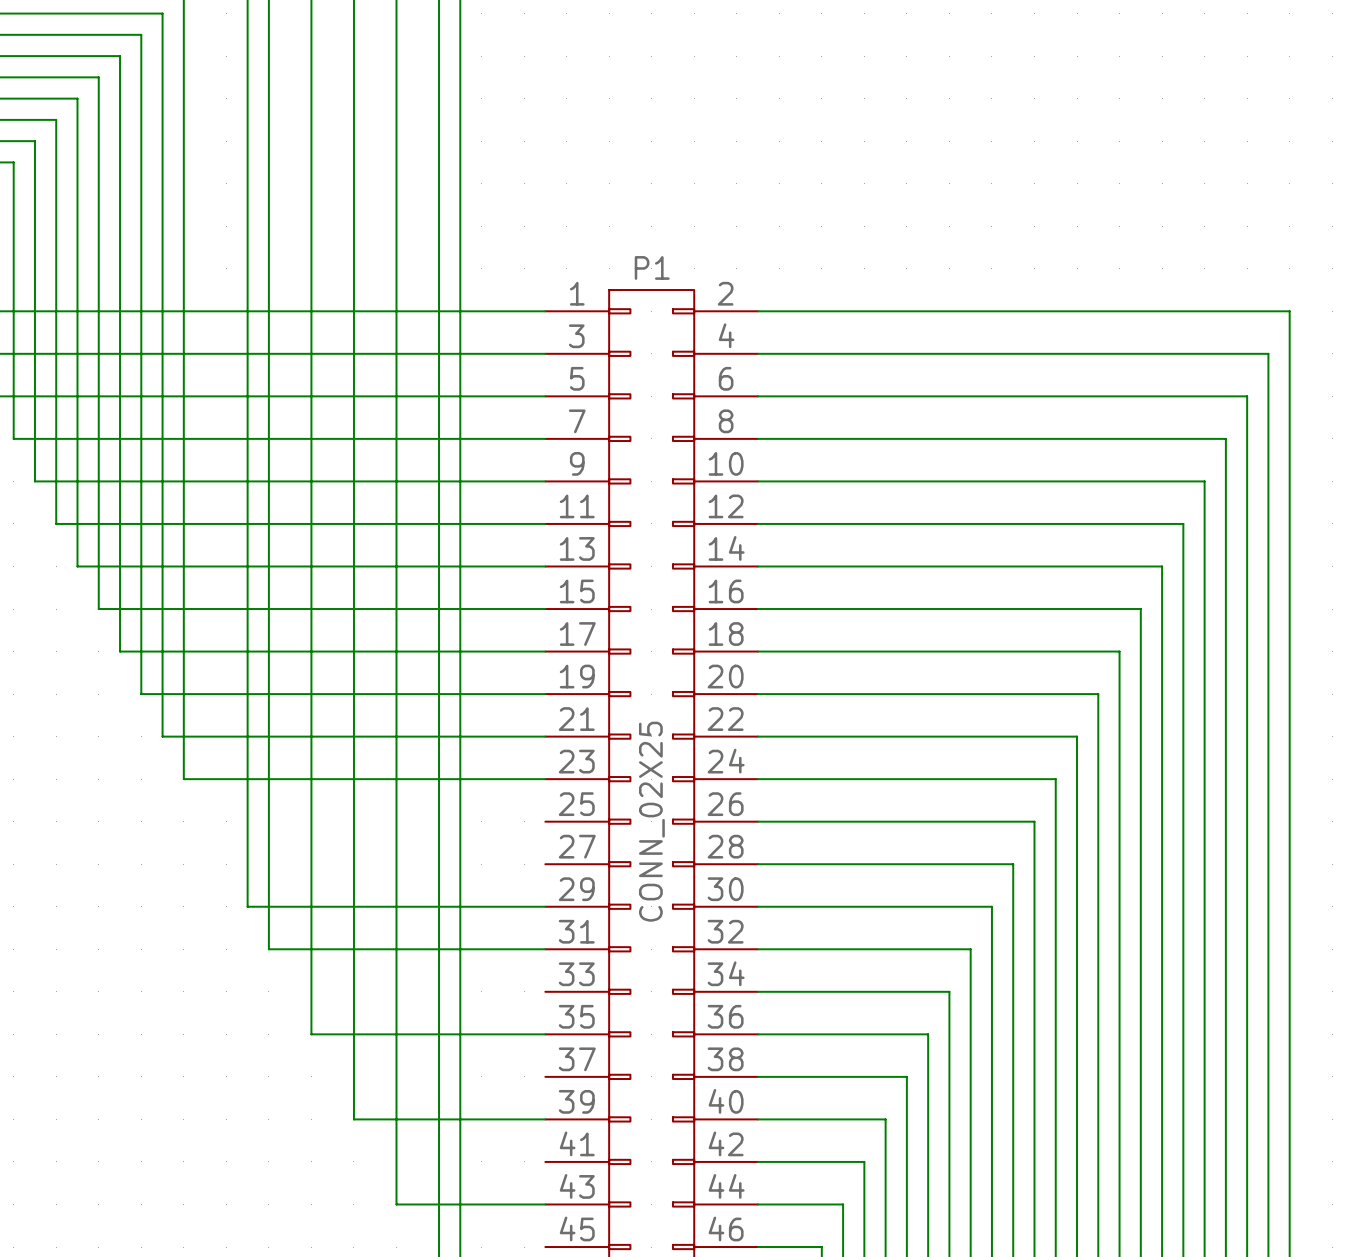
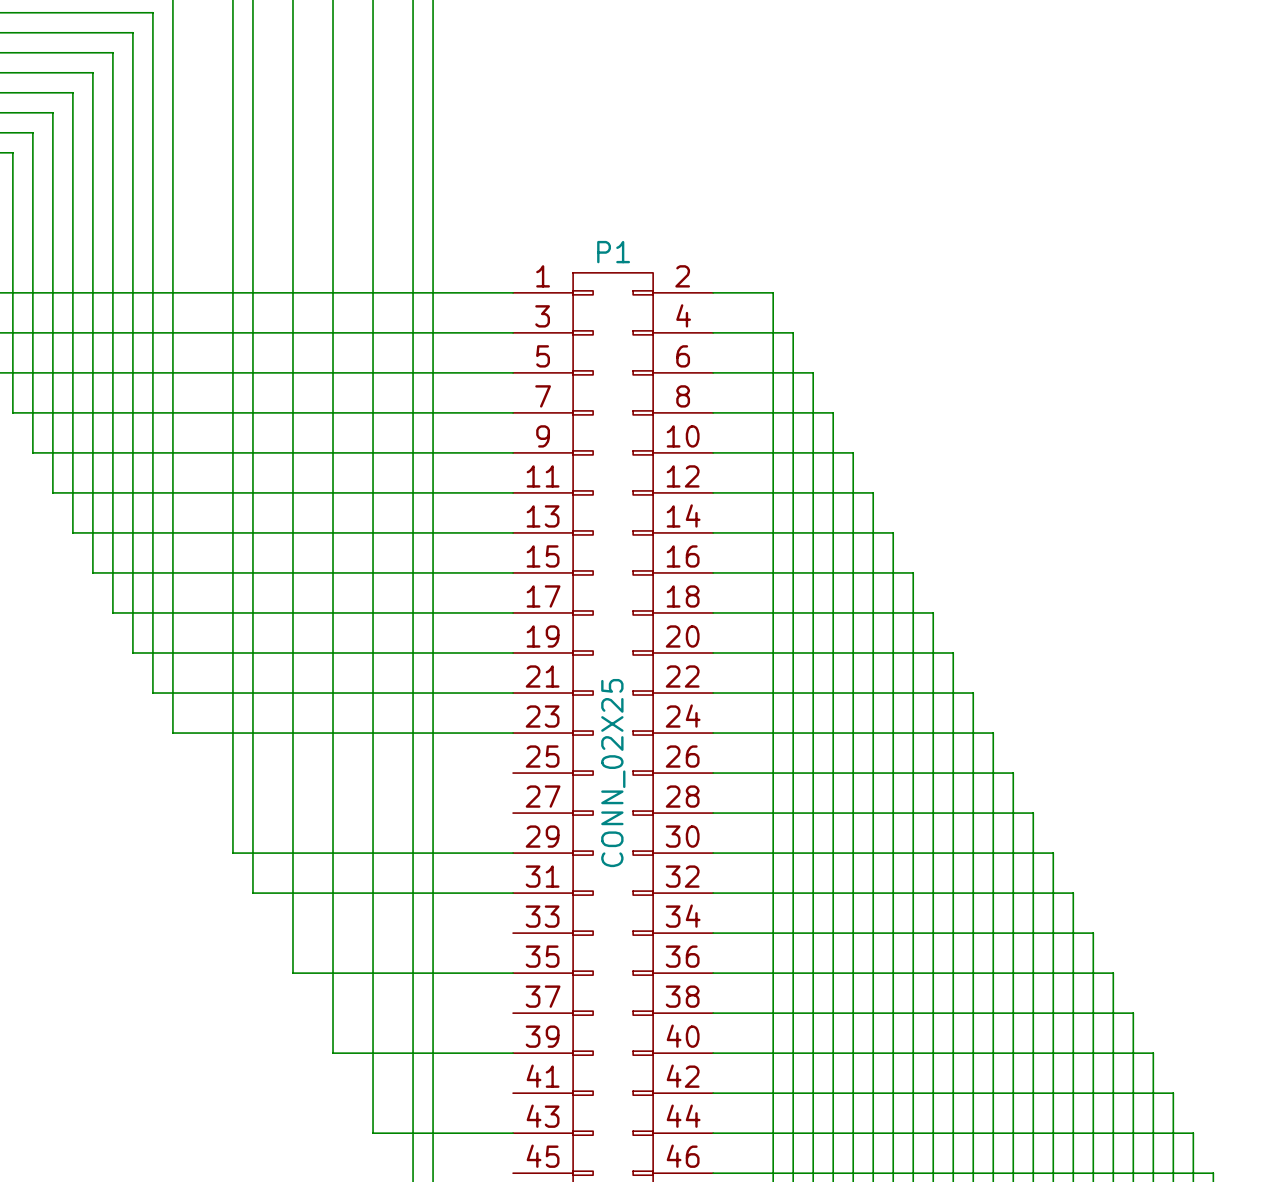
wire: (821, 311) (1289, 311) (1289, 1247) -> (773, 292) (773, 1173) (1213, 1173)
wire: (843, 353) (1268, 353) (1268, 1204) -> (793, 332) (793, 1133) (1193, 1133)
wire: (864, 396) (1247, 396) (1247, 1161) -> (813, 372) (813, 1093) (1173, 1093)
wire: (885, 438) (1225, 438) (1225, 1119) -> (833, 412) (833, 1053) (1153, 1053)
wire: (906, 481) (1204, 481) (1204, 1076) -> (853, 452) (853, 1013) (1133, 1013)
wire: (928, 523) (1183, 523) (1183, 1034) -> (873, 492) (873, 973) (1113, 973)
wire: (949, 566) (1162, 566) (1162, 991) -> (893, 532) (893, 933) (1093, 933)
wire: (970, 609) (1140, 609) (1140, 949) -> (913, 572) (913, 893) (1073, 893)
wire: (991, 651) (1119, 651) (1119, 906) -> (933, 612) (933, 853) (1053, 853)
wire: (1013, 694) (1098, 694) (1098, 864) -> (953, 652) (953, 813) (1033, 813)
wire: (1034, 736) (1077, 736) (1077, 821) -> (973, 693) (973, 773) (1013, 773)

